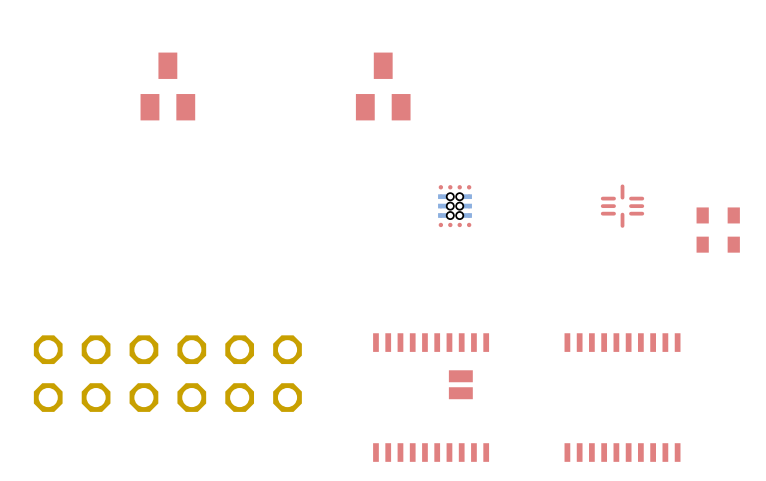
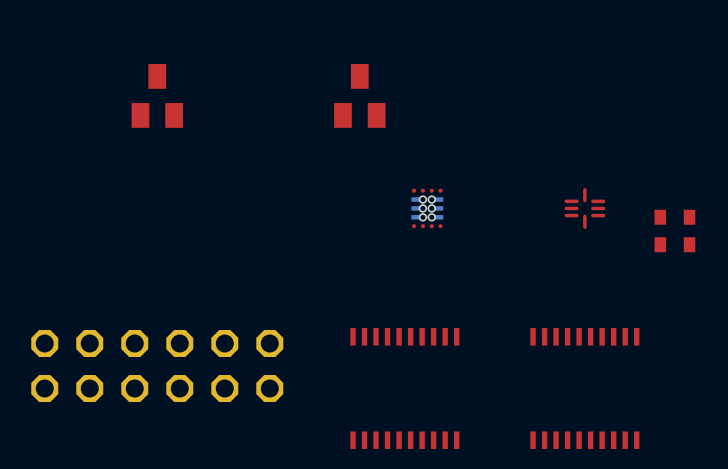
part: (460, 384) -> none

